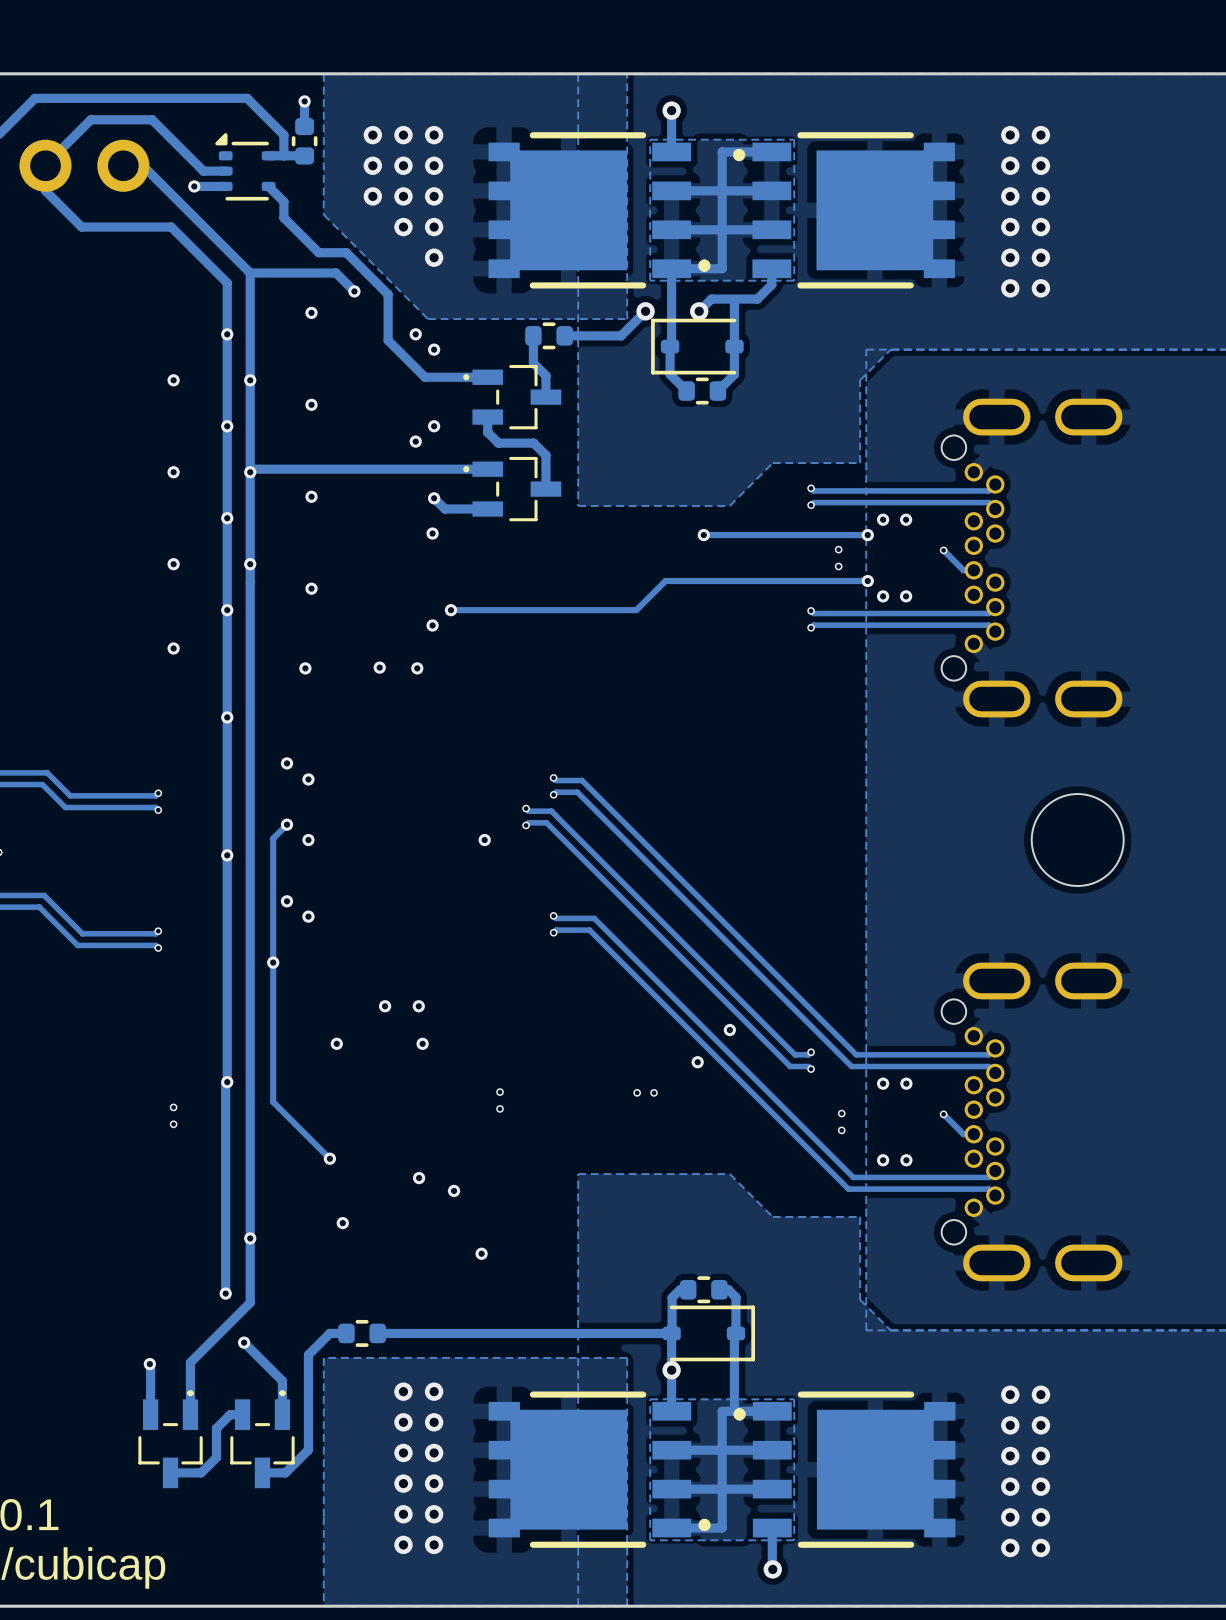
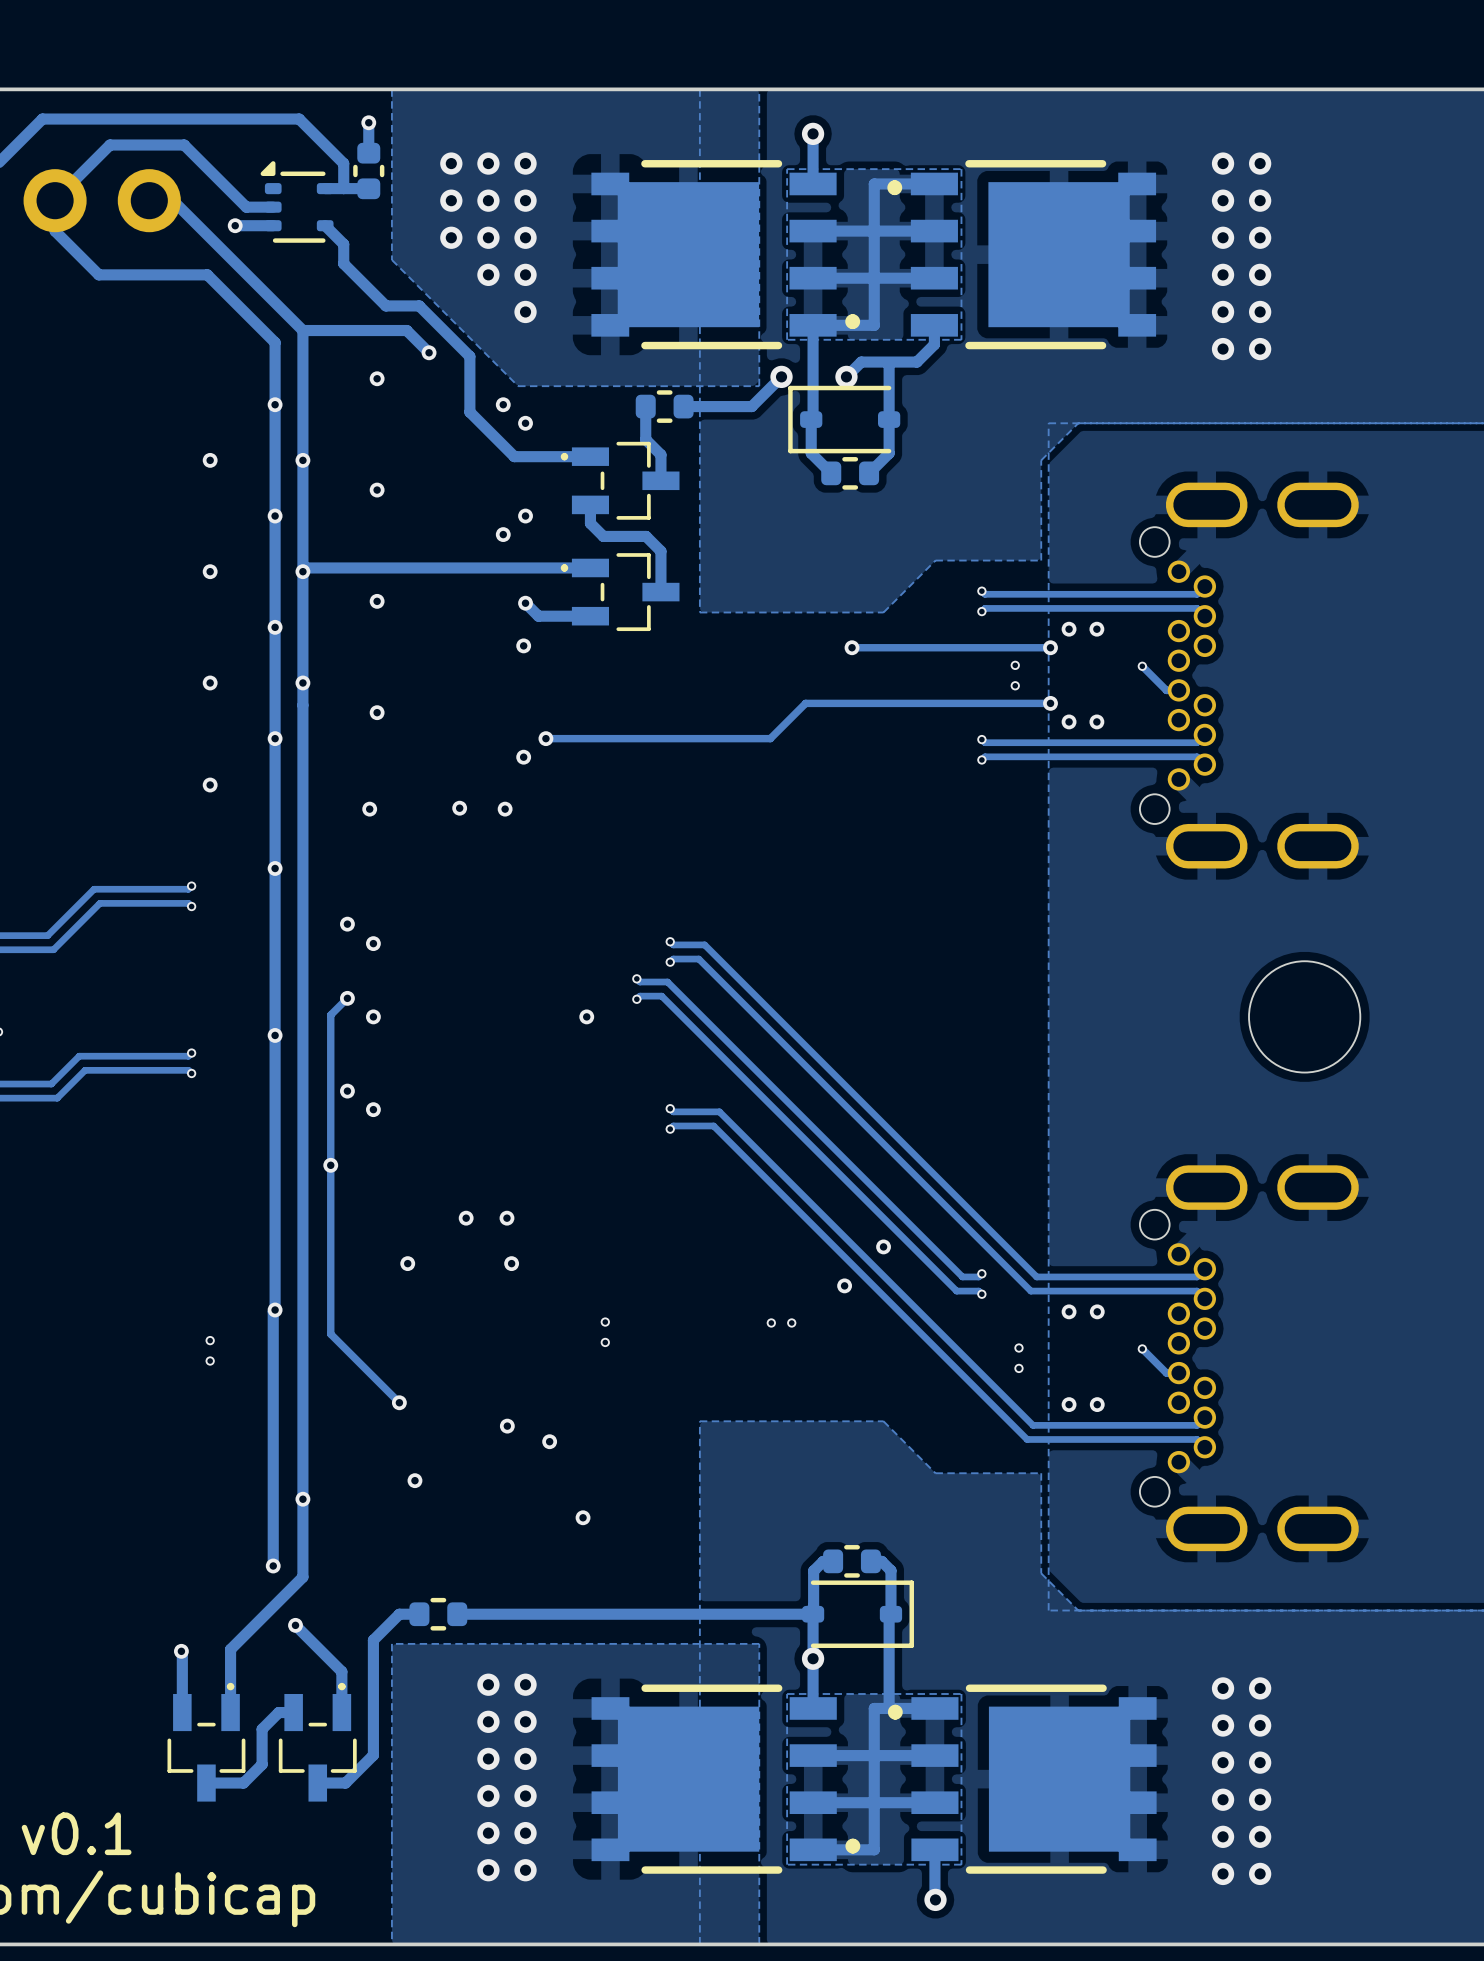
via: none -> (191, 886)
via: none -> (191, 906)
track: (39, 772) (47, 772) (70, 795) (155, 795) (158, 793) -> (47, 935) (94, 889) (188, 889) (191, 886)
track: (42, 784) (65, 807) (155, 807) (158, 810) -> (51, 949) (99, 903) (188, 903) (191, 906)
via: (158, 793) -> none
via: (158, 810) -> none
via: none -> (191, 1053)
via: none -> (191, 1073)
track: (42, 895) (82, 933) (155, 933) (158, 931) -> (51, 1084) (79, 1056) (188, 1056) (191, 1053)
track: (39, 907) (77, 945) (155, 945) (158, 948) -> (47, 1098) (57, 1098) (85, 1070) (188, 1070) (191, 1073)
via: (158, 931) -> none
via: (158, 948) -> none

